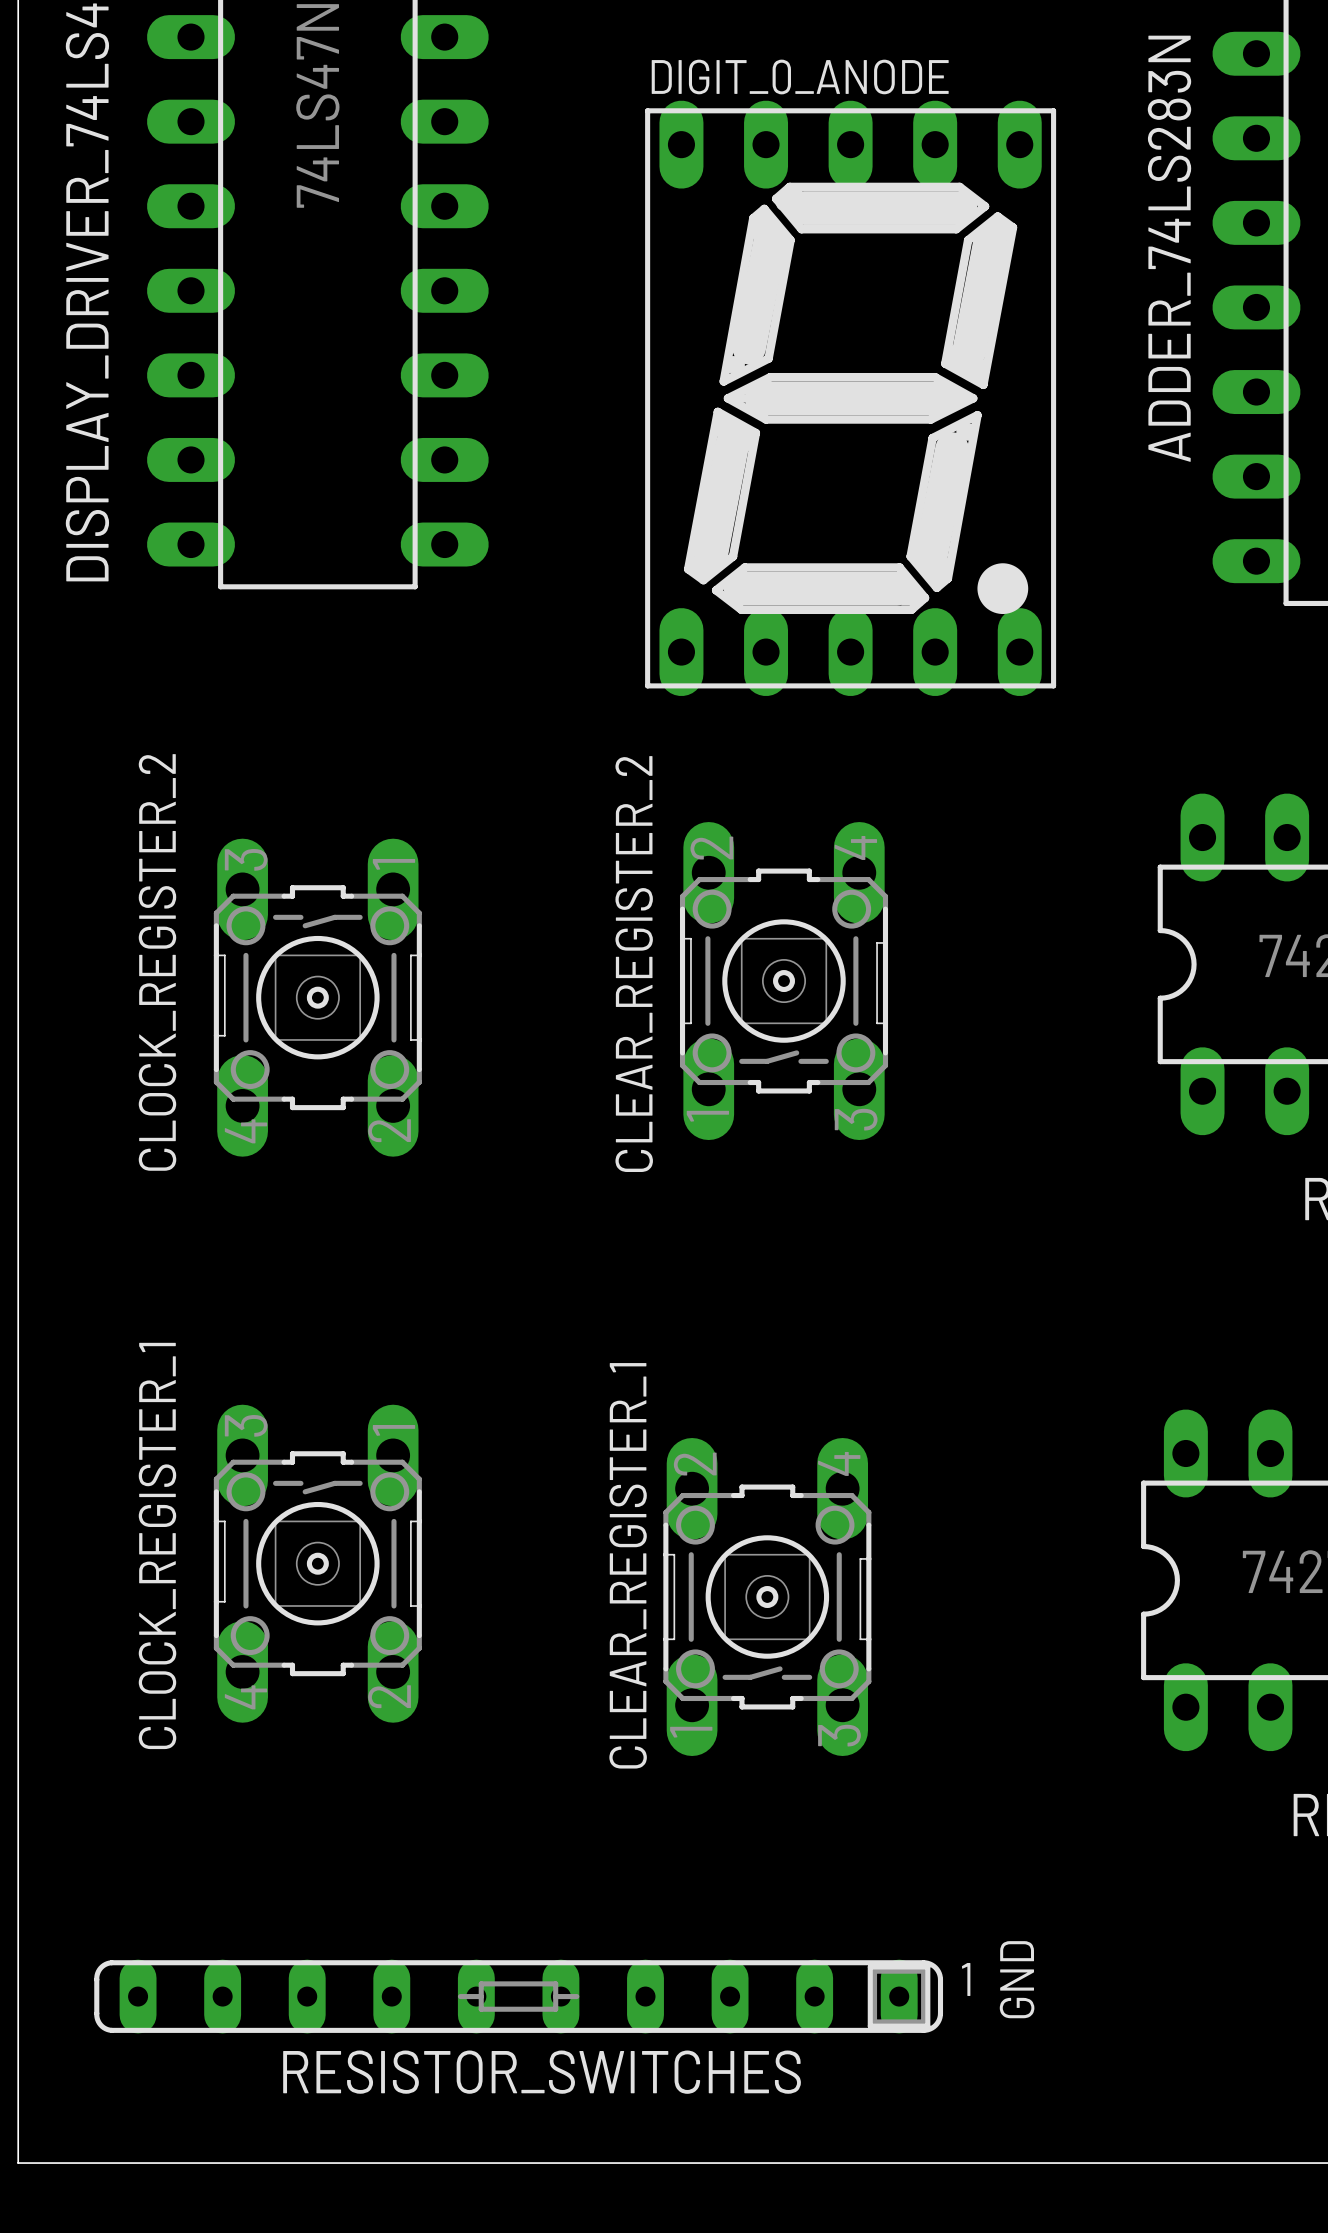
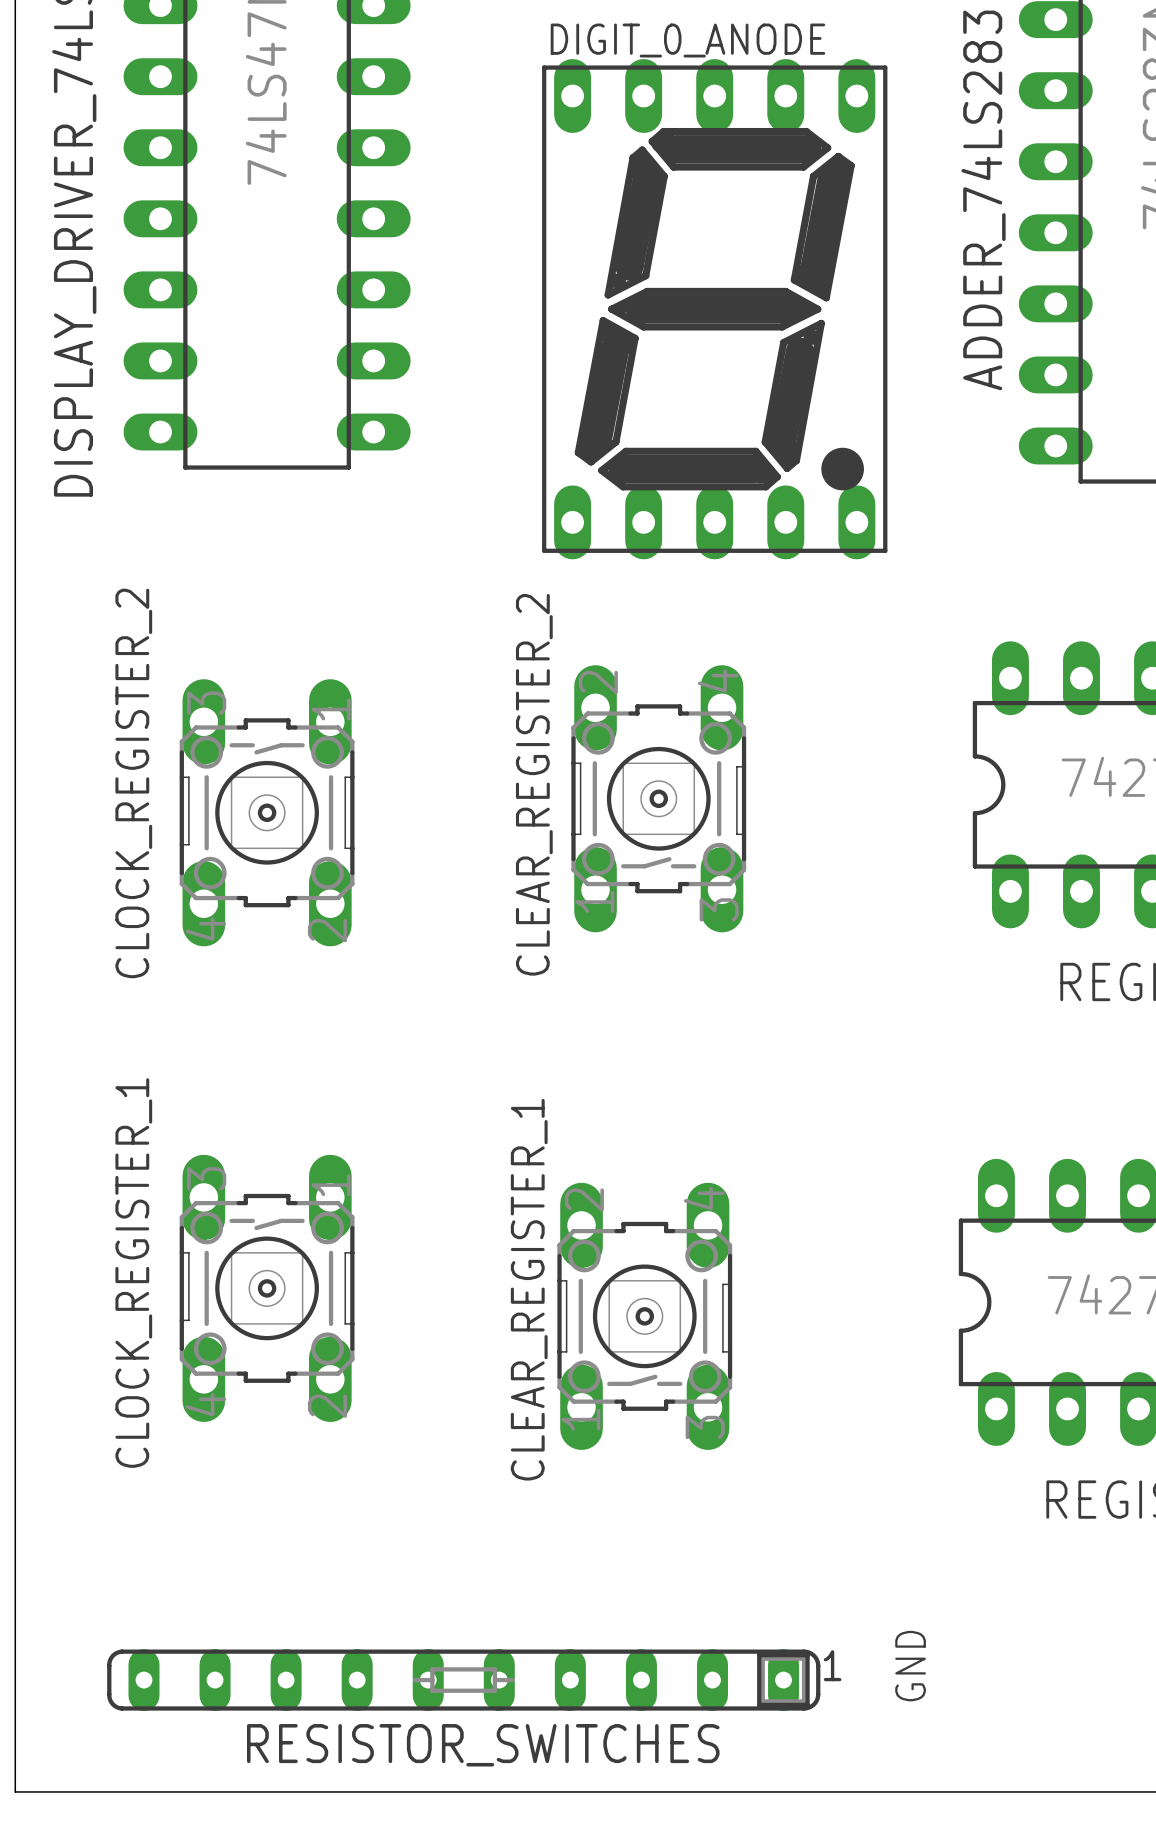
text position: GND (1017, 1979) -> GND (910, 1666)
RESISTOR_SWITCHES position: (518, 1996) -> (463, 1680)

